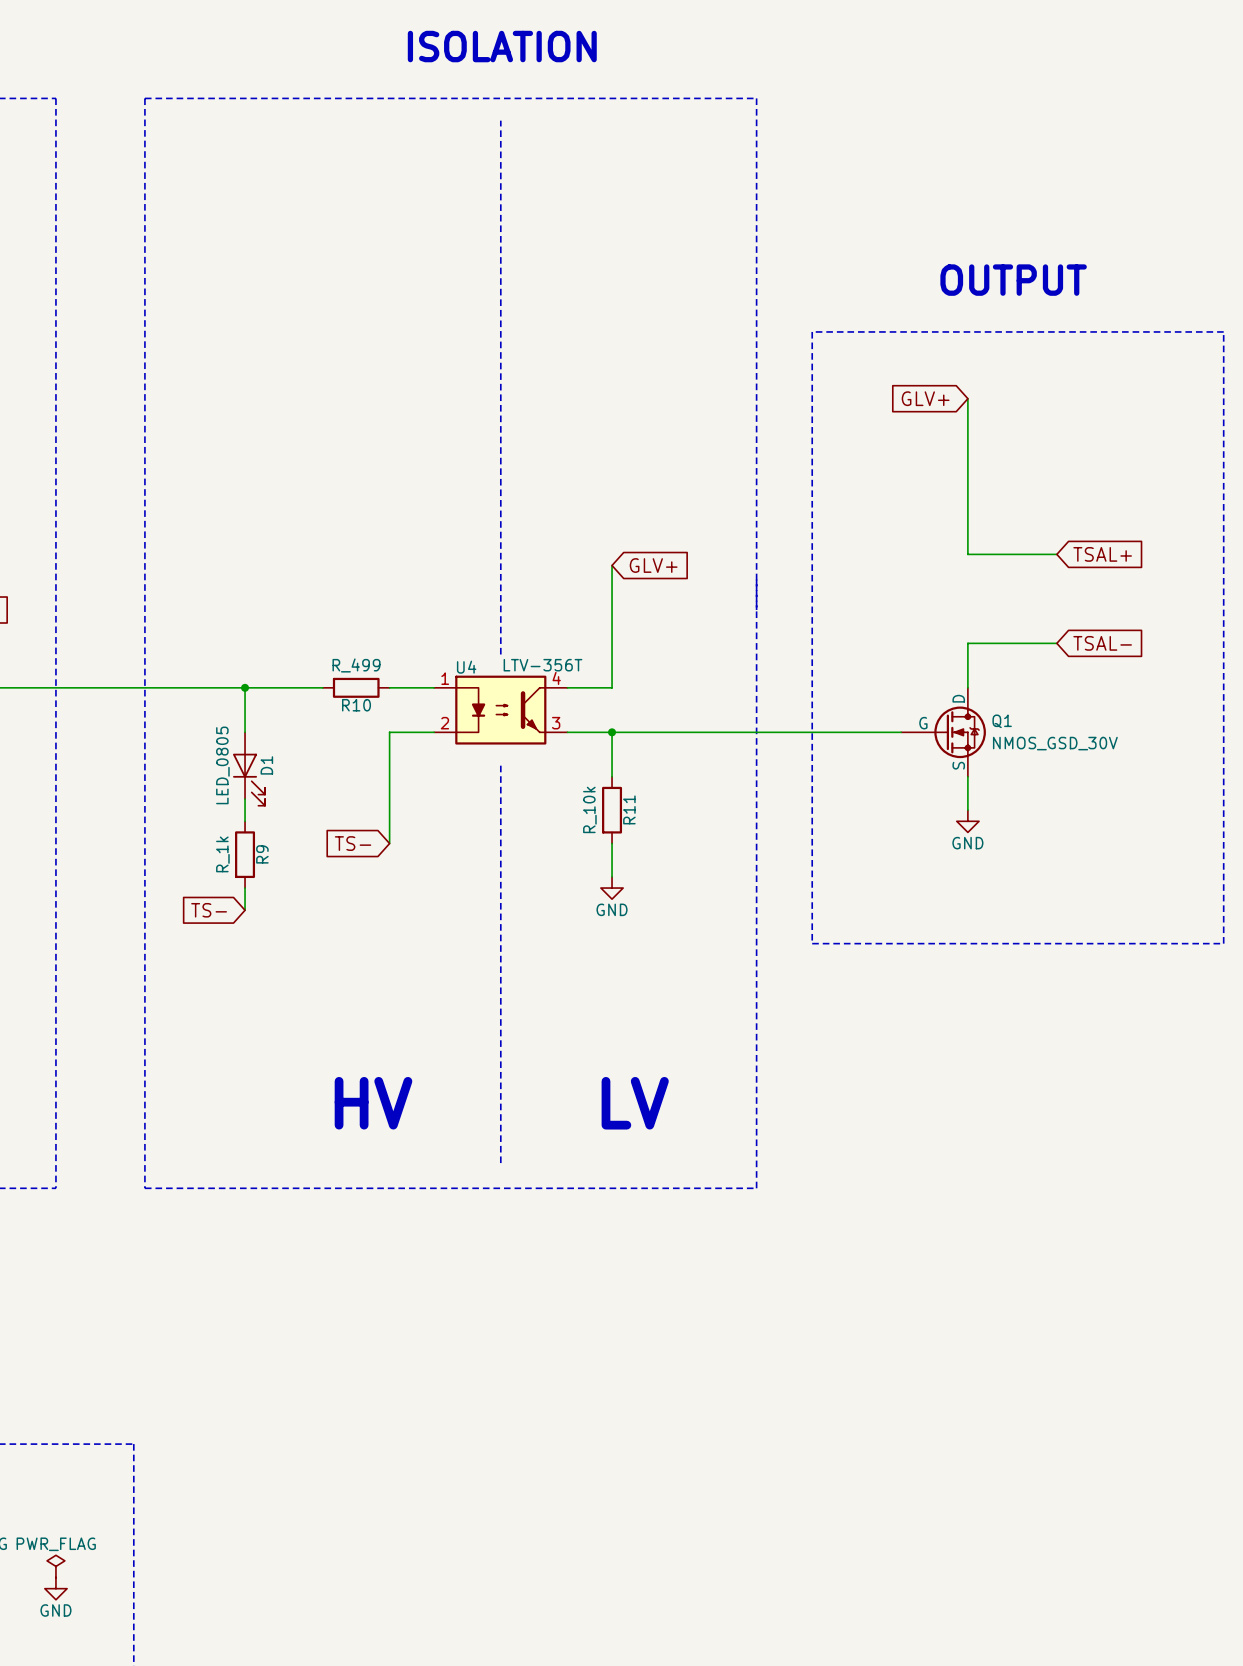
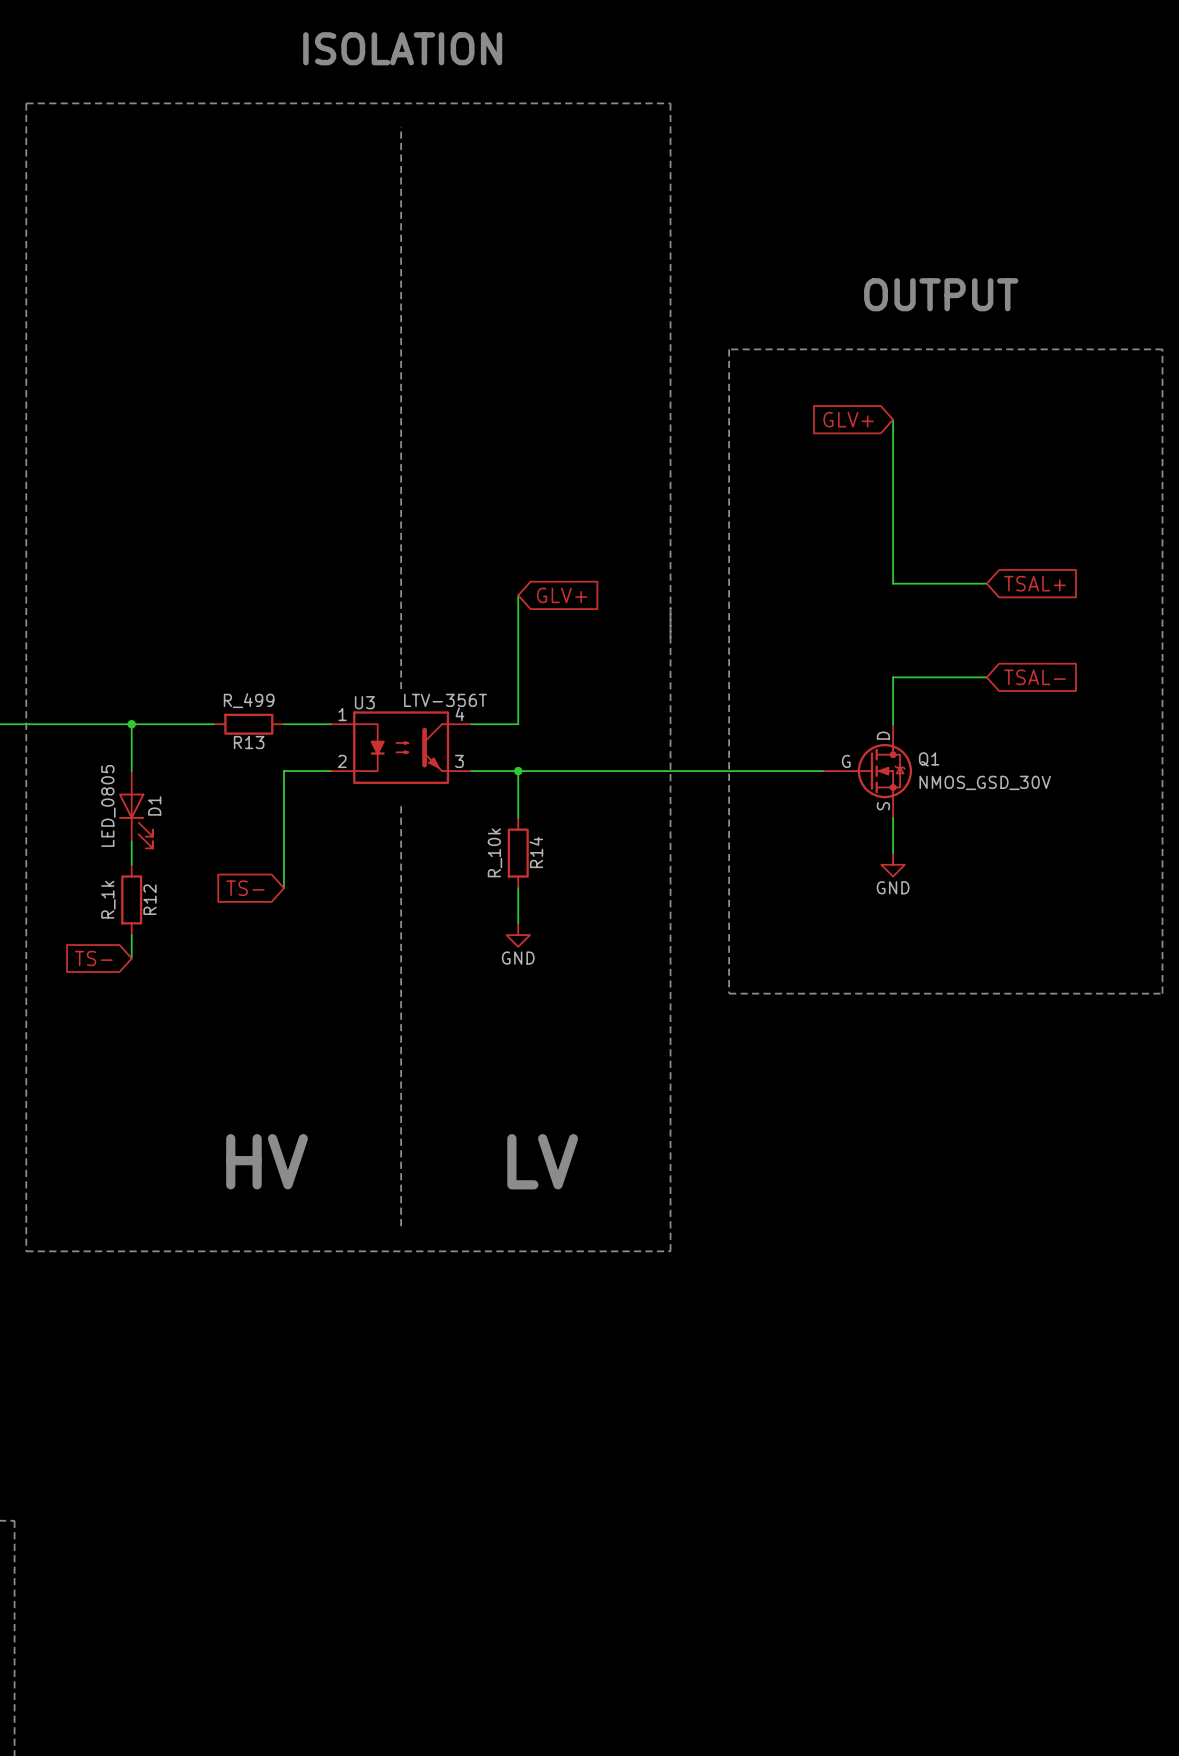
U4 name: U4 (466, 667) -> U3 (364, 702)
R10 name: R10 (356, 705) -> R13 (249, 742)
R11 name: R11 (629, 809) -> R14 (536, 852)
R9 name: R9 (262, 854) -> R12 (150, 899)

